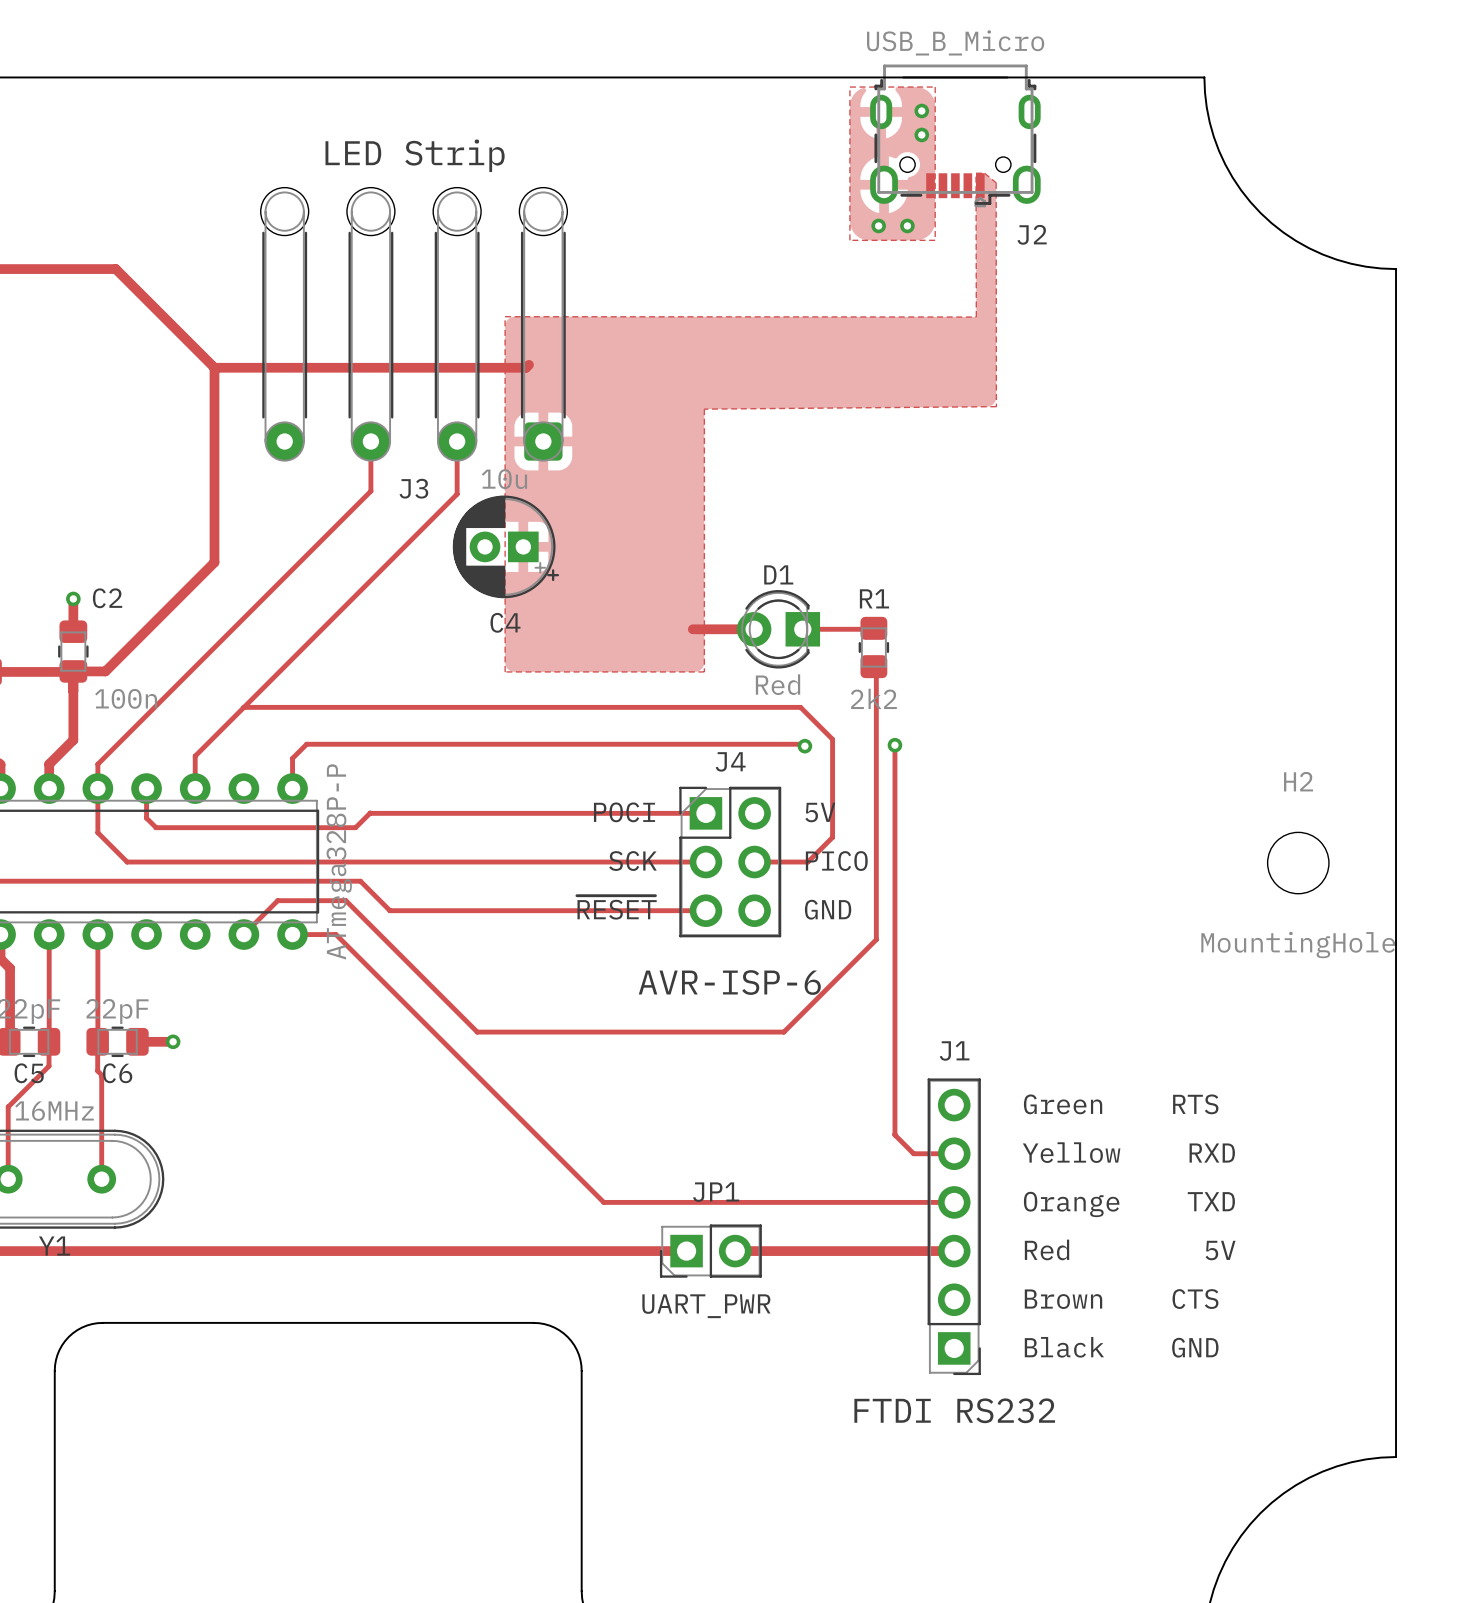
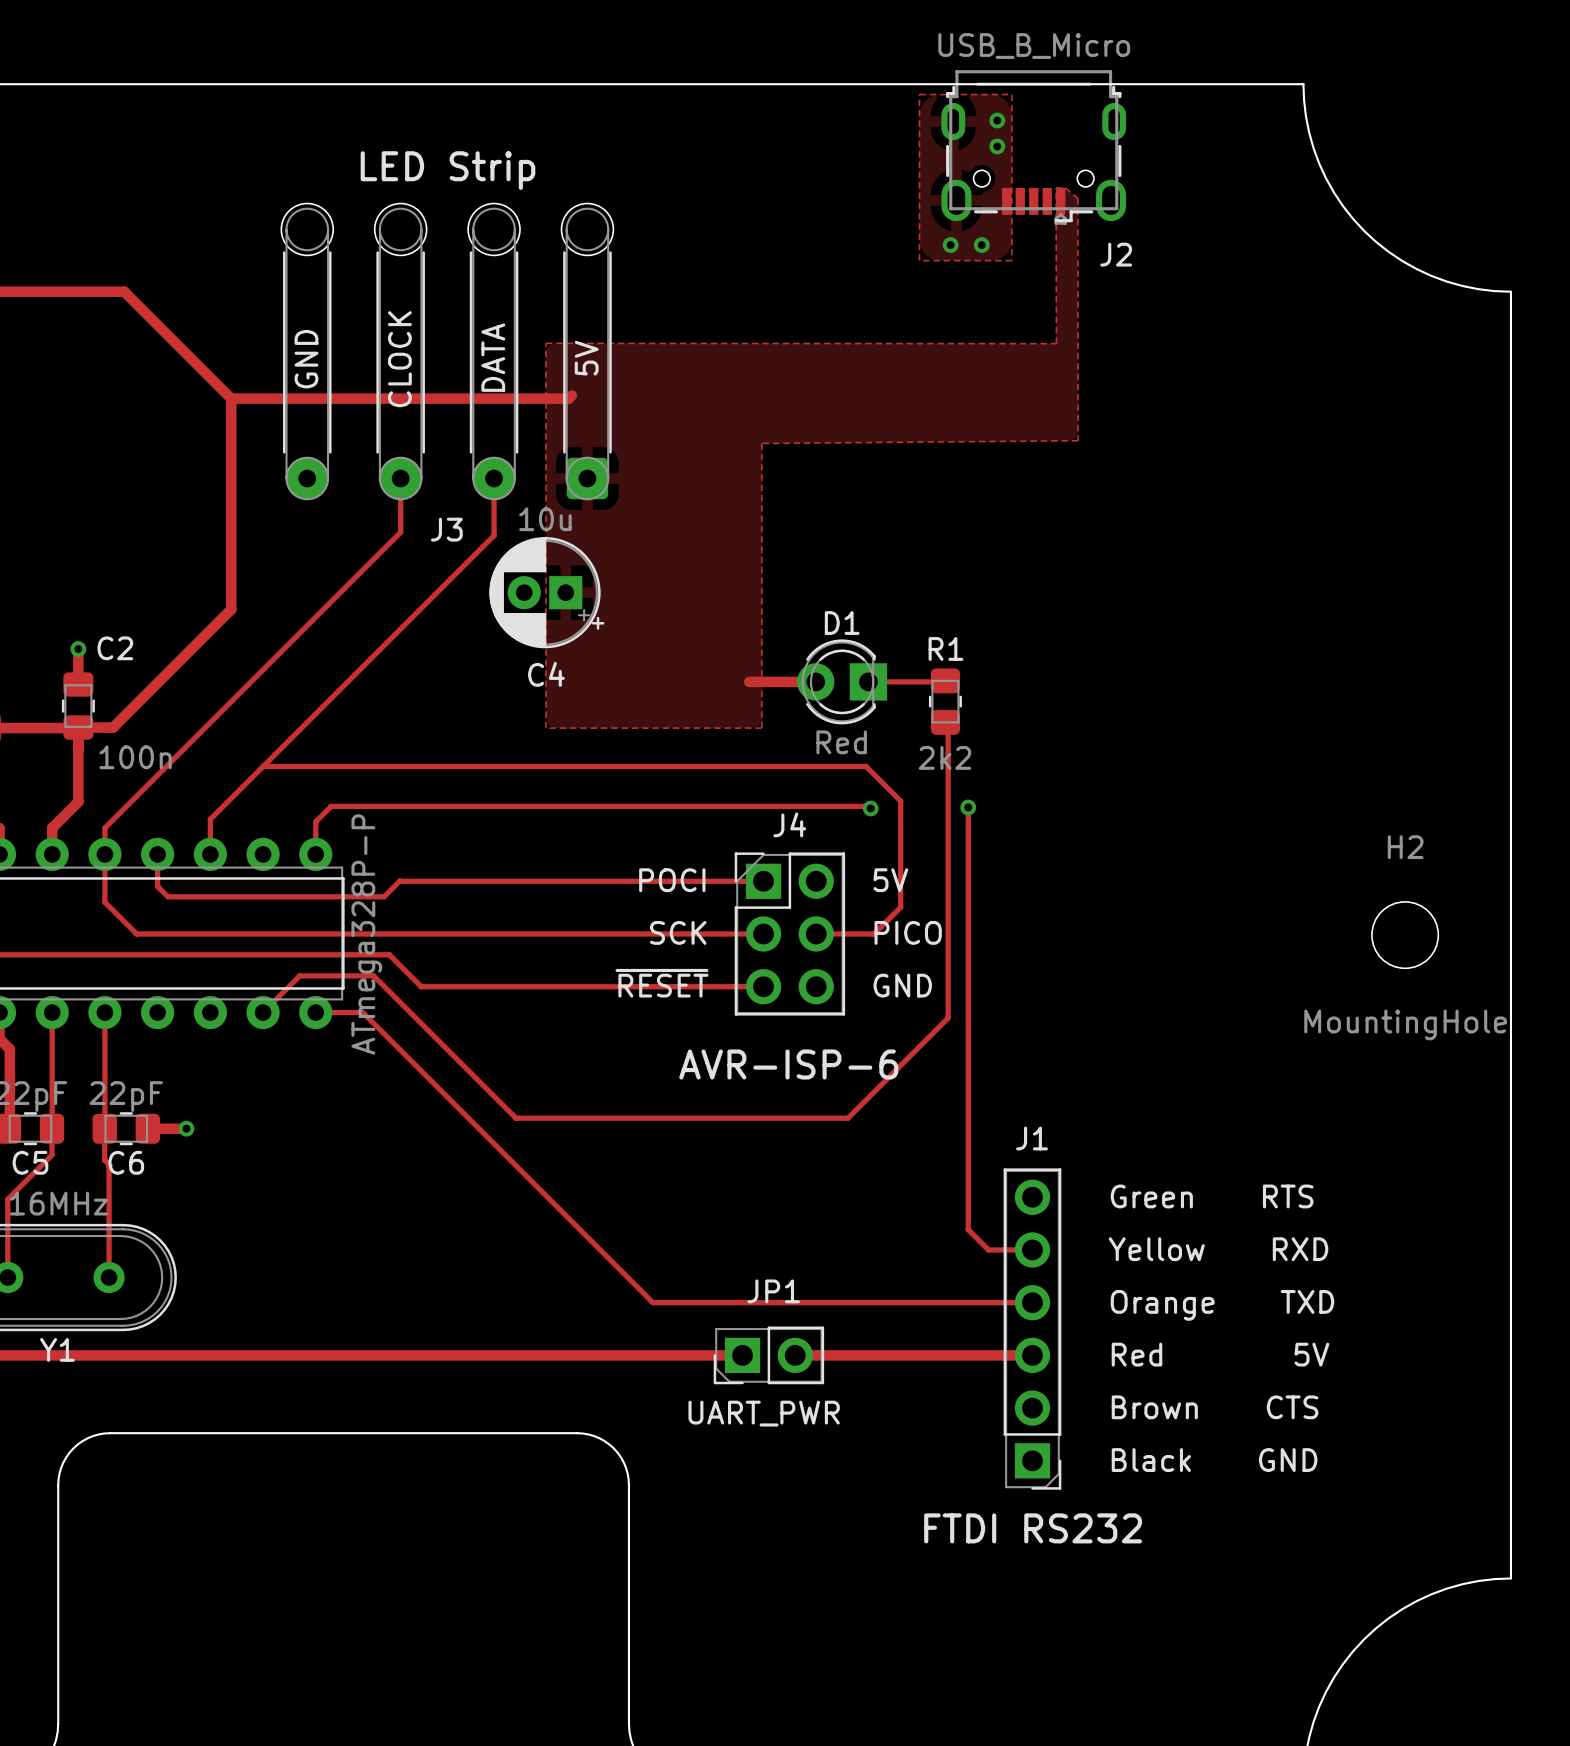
text: none -> CLOCK (399, 359)
text: none -> DATA (493, 357)
text: none -> 5V (586, 358)
text: none -> GND (306, 359)

